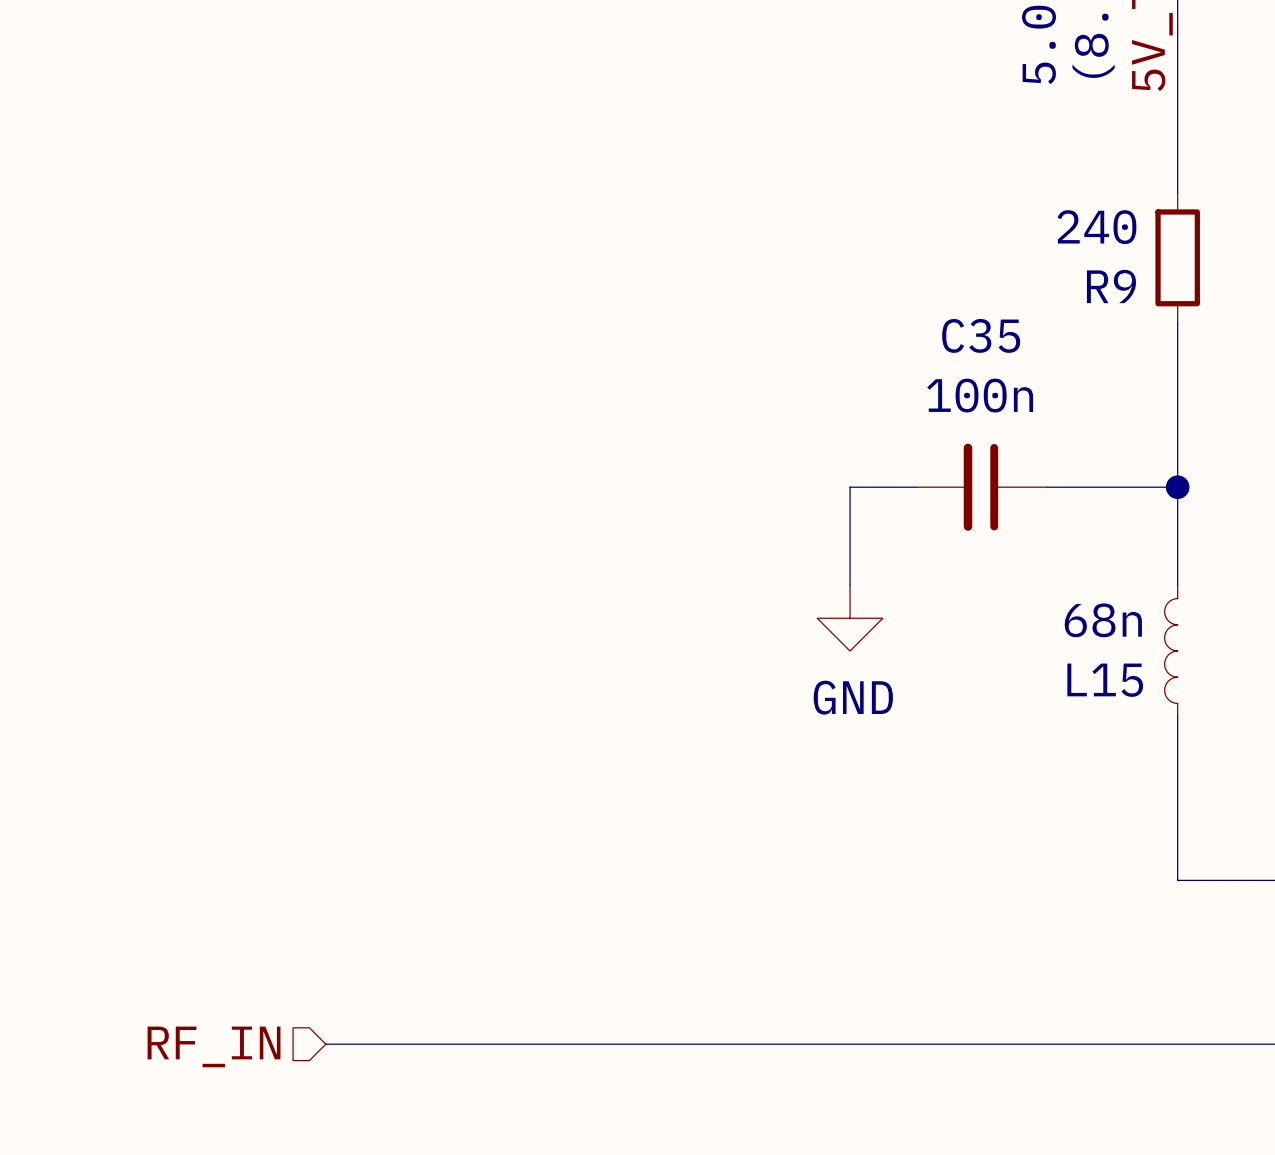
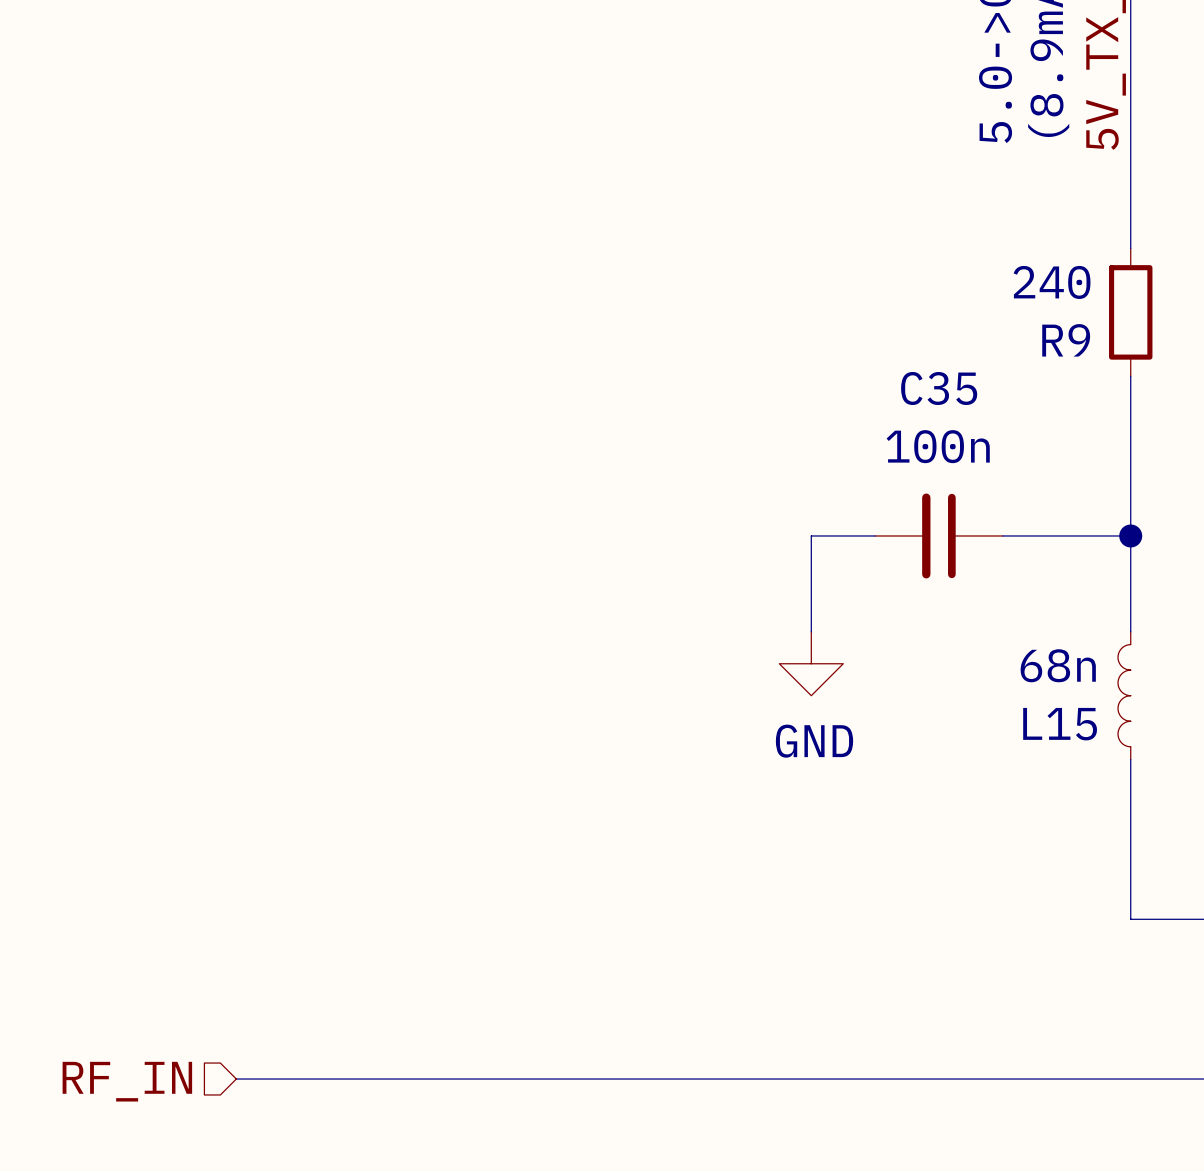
wire: none -> (236, 1079) (300, 1079)
hierarchical label position: RF_IN (214, 1046) -> RF_IN (127, 1081)

